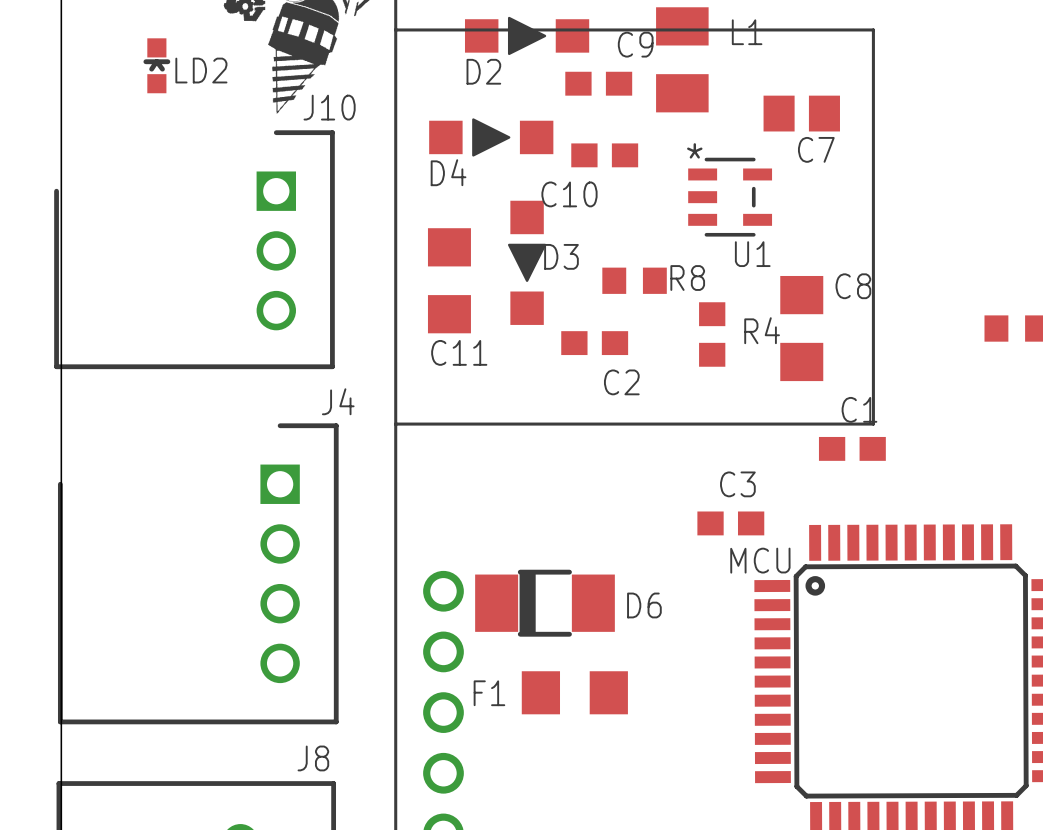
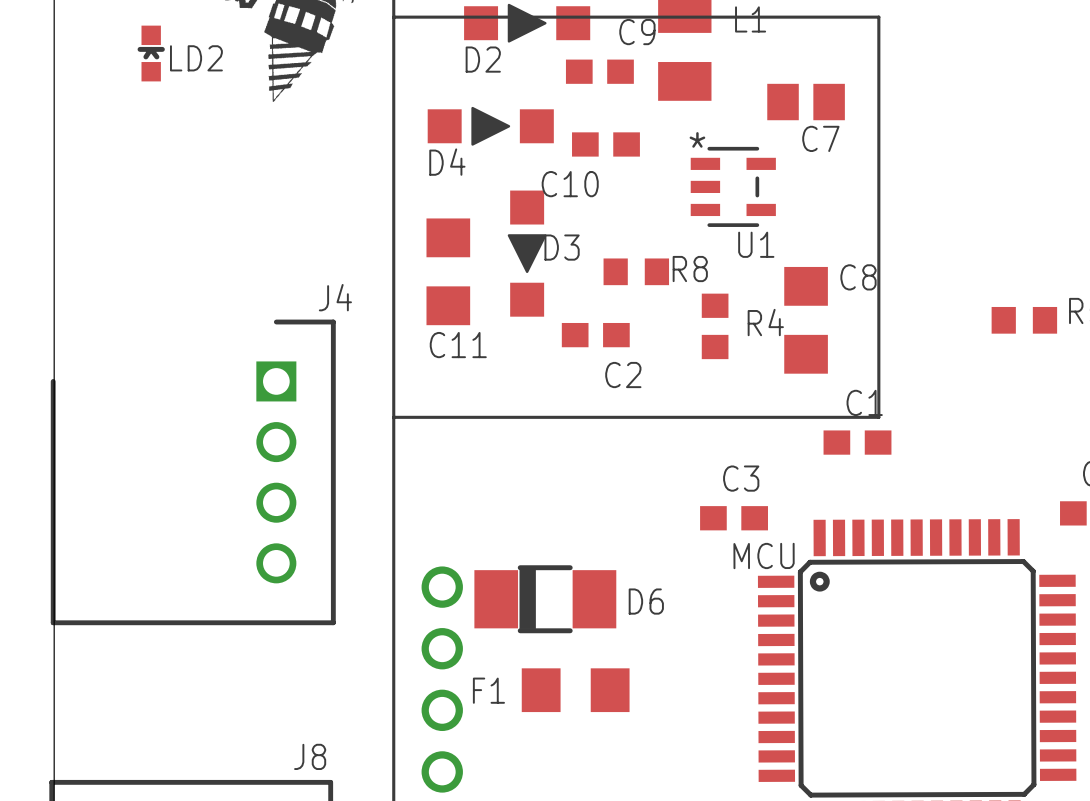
J10: (194, 249) -> none
J4 position: (198, 573) -> (193, 472)

